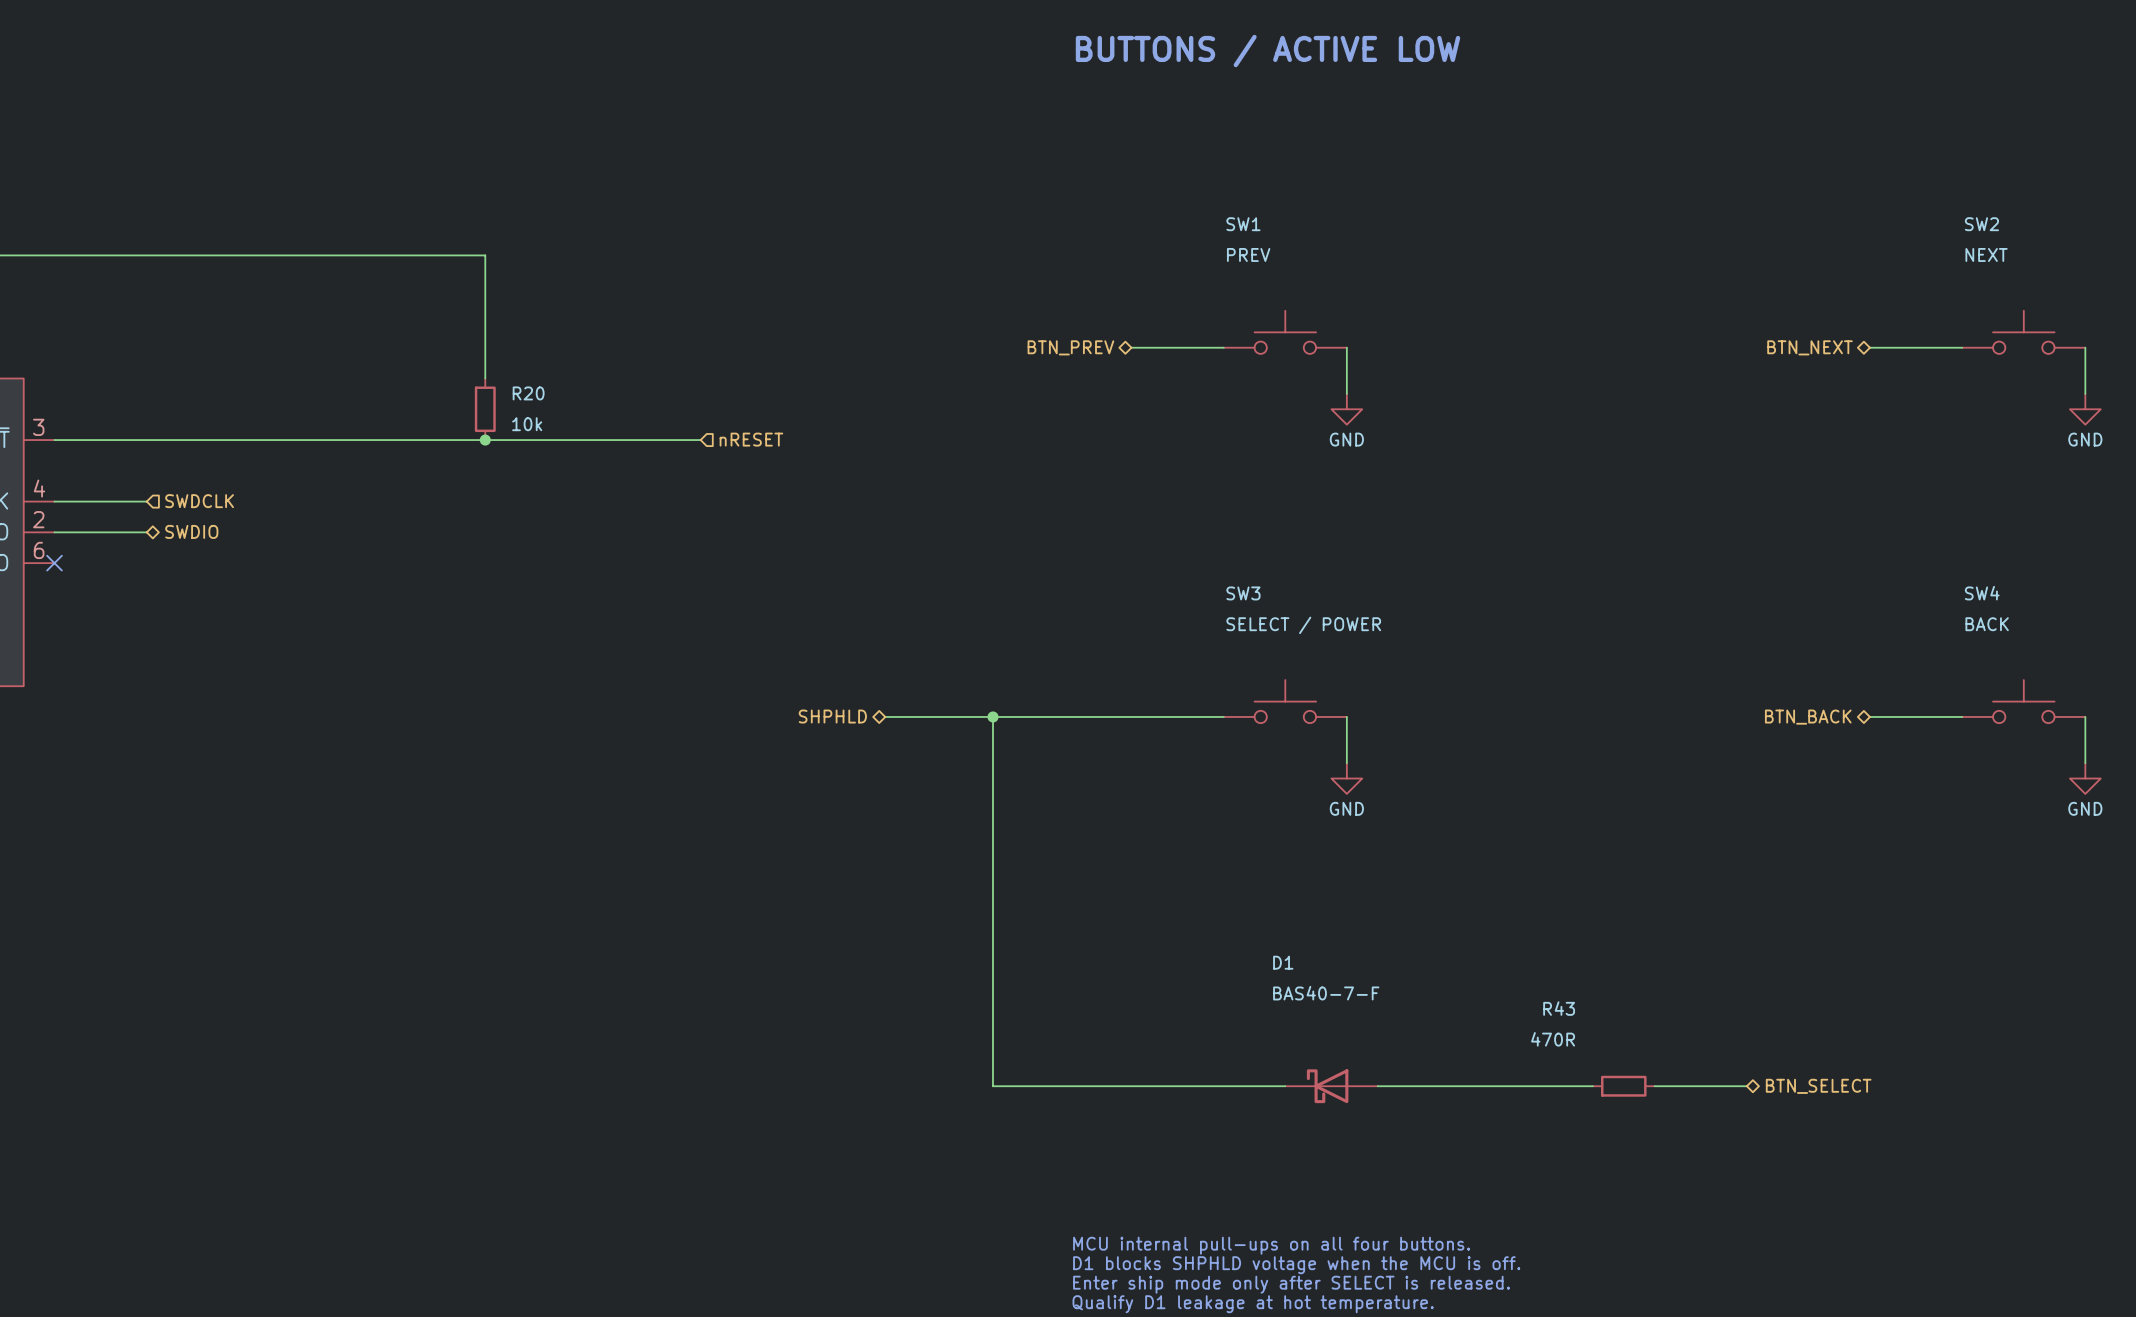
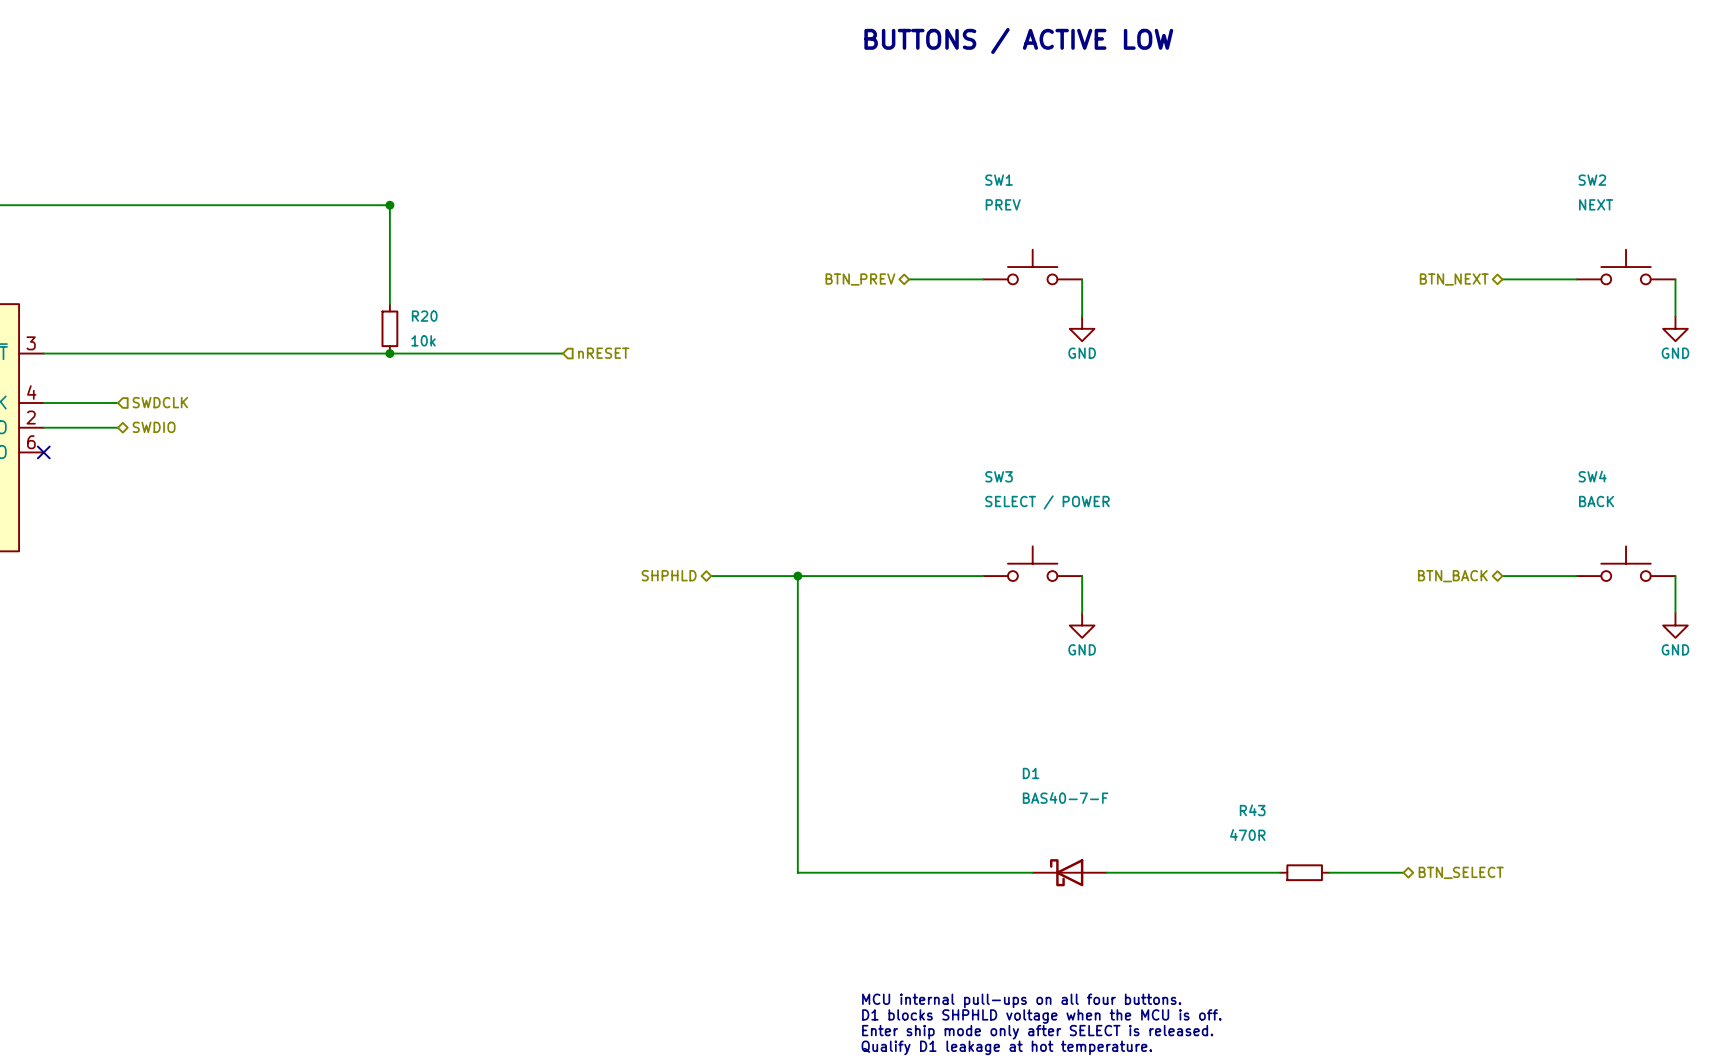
junction: none -> (389, 205)

